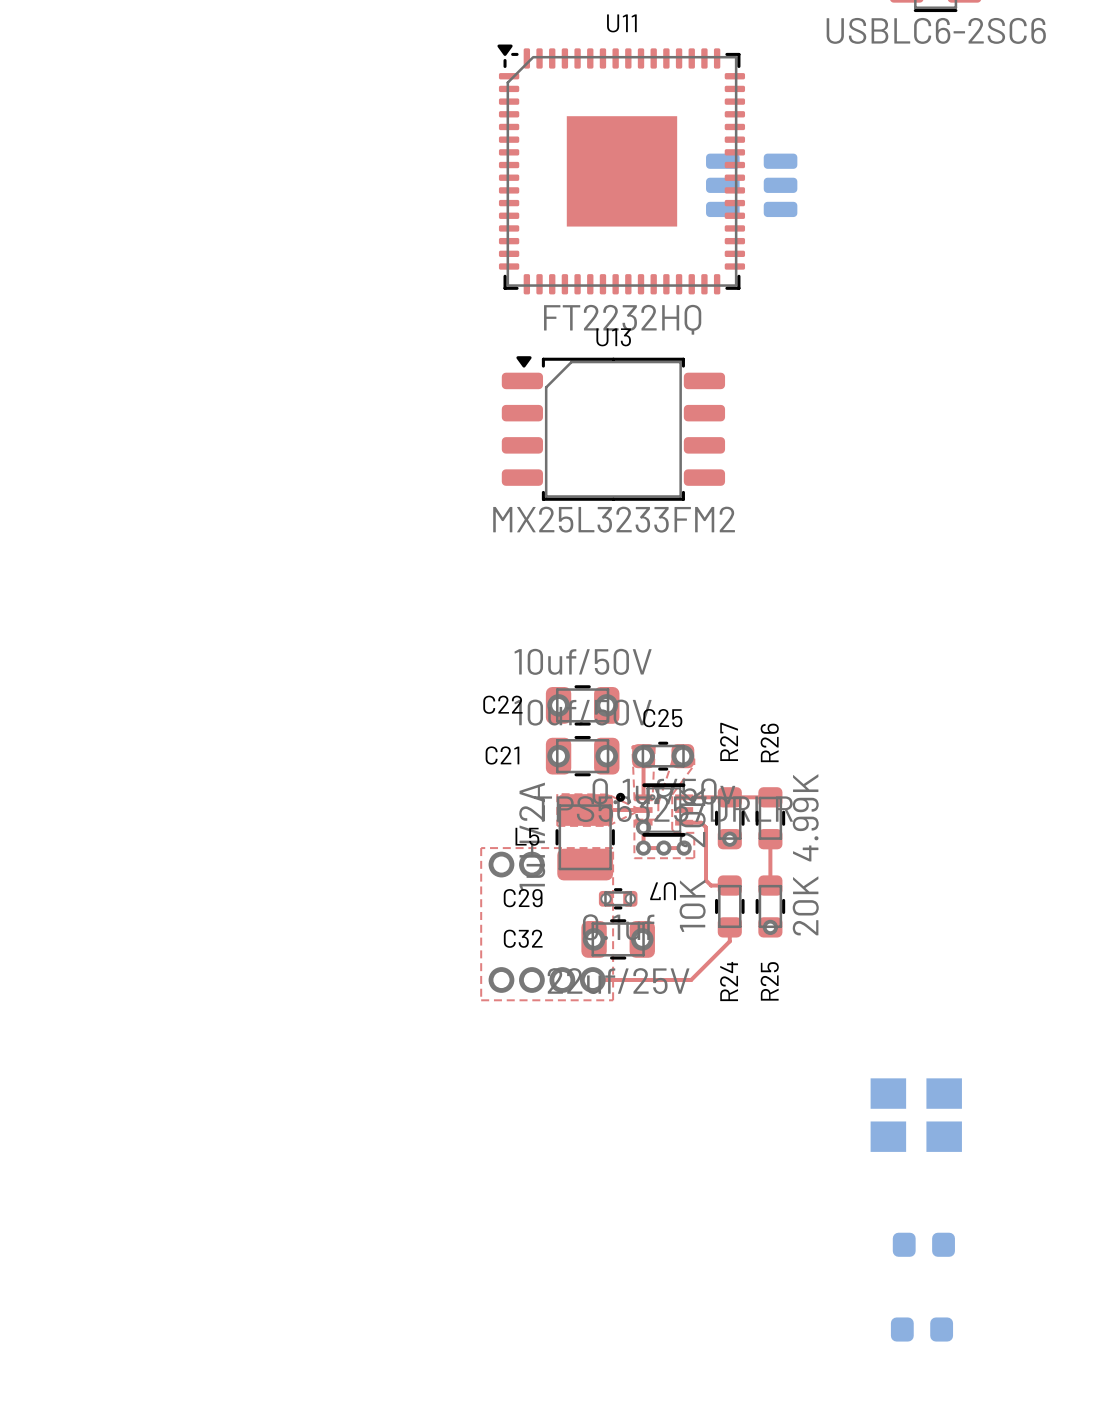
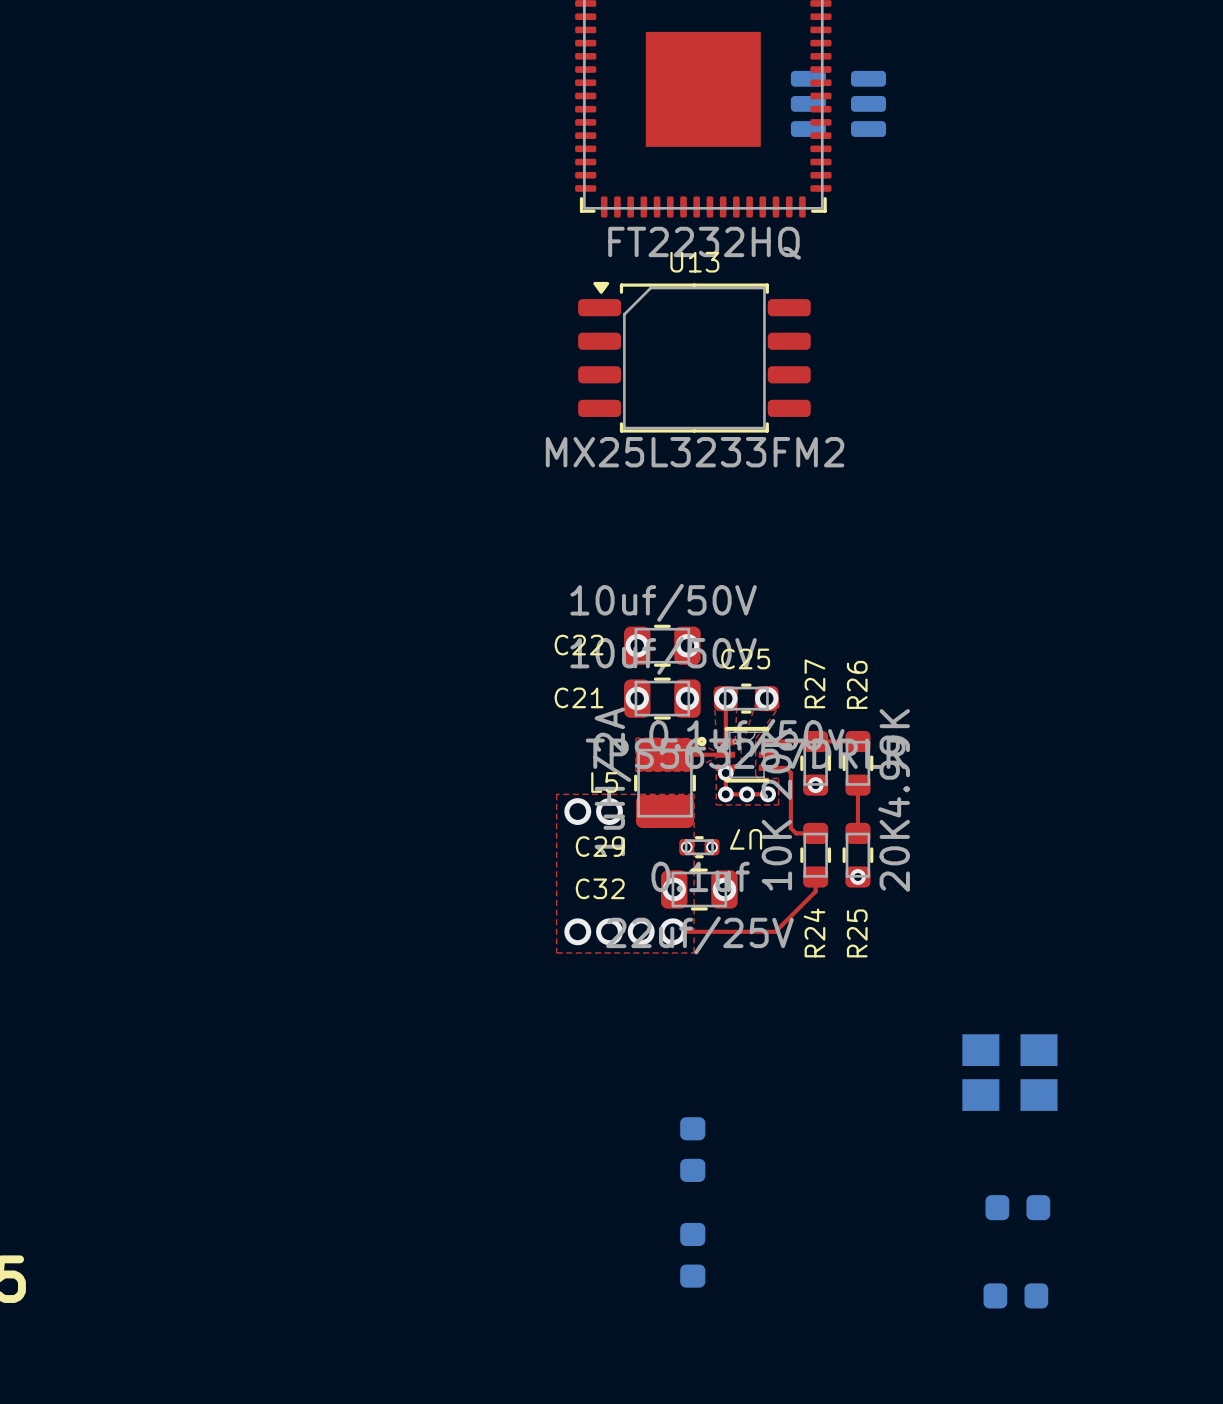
part: none -> (692, 1149)
part: none -> (692, 1255)

